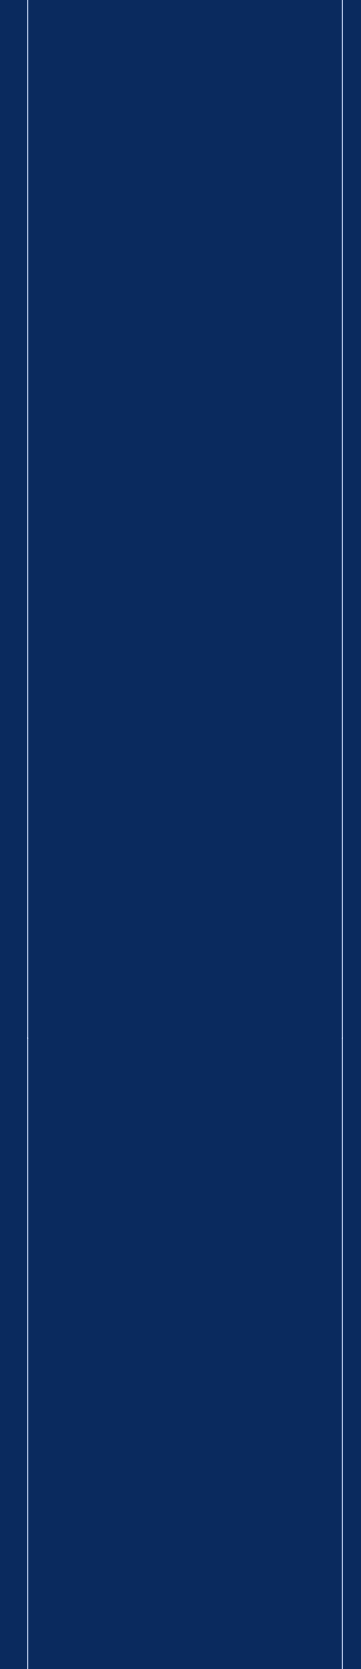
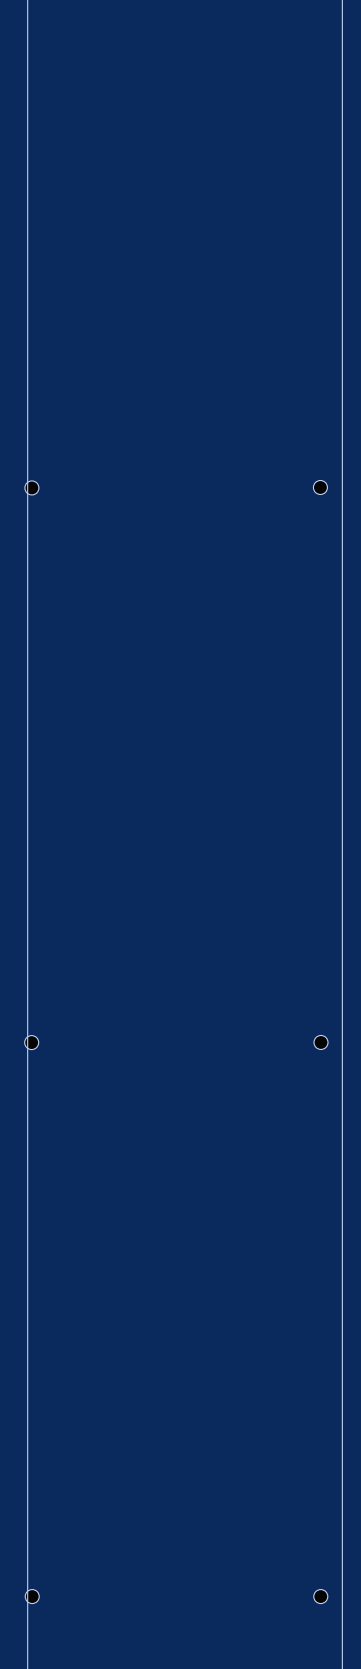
hole: none -> (31, 487)
hole: none -> (320, 487)
hole: none -> (31, 1042)
hole: none -> (320, 1042)
hole: none -> (32, 1596)
hole: none -> (320, 1596)

